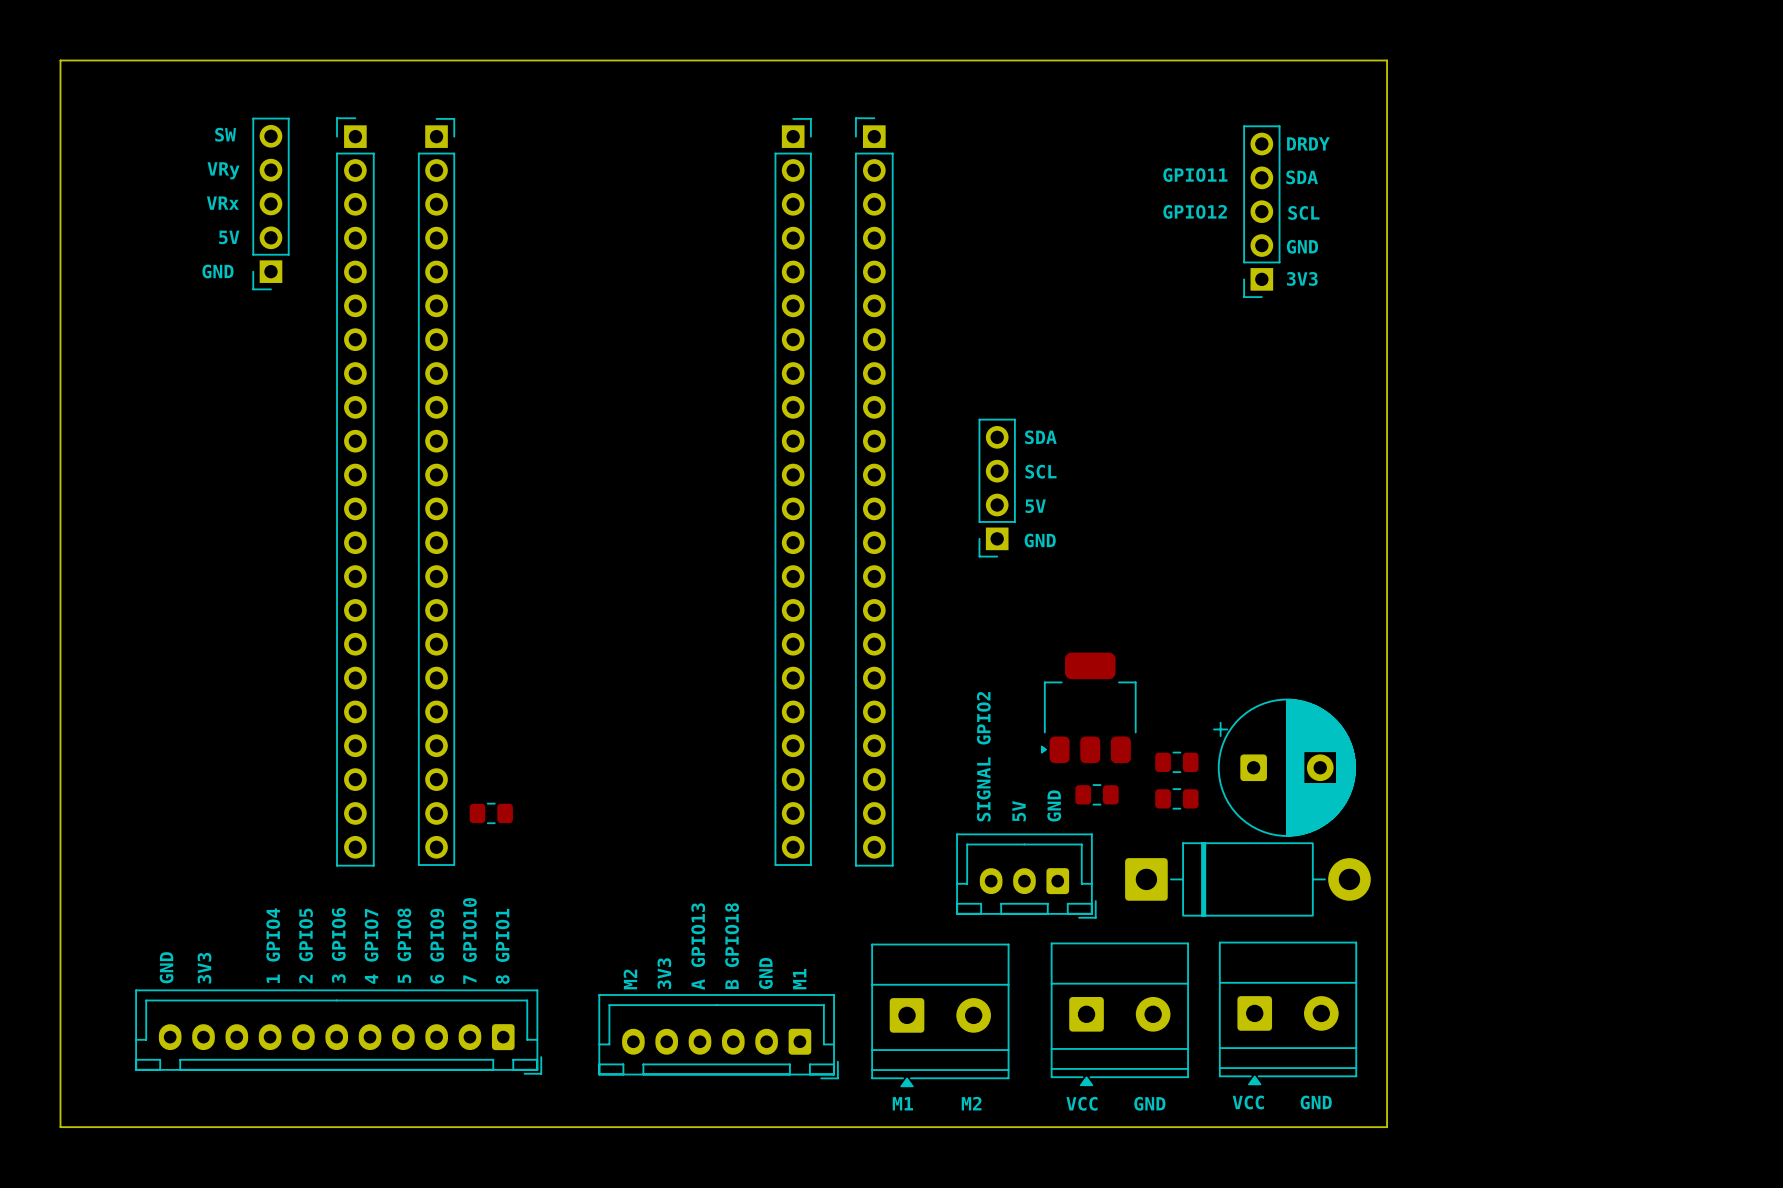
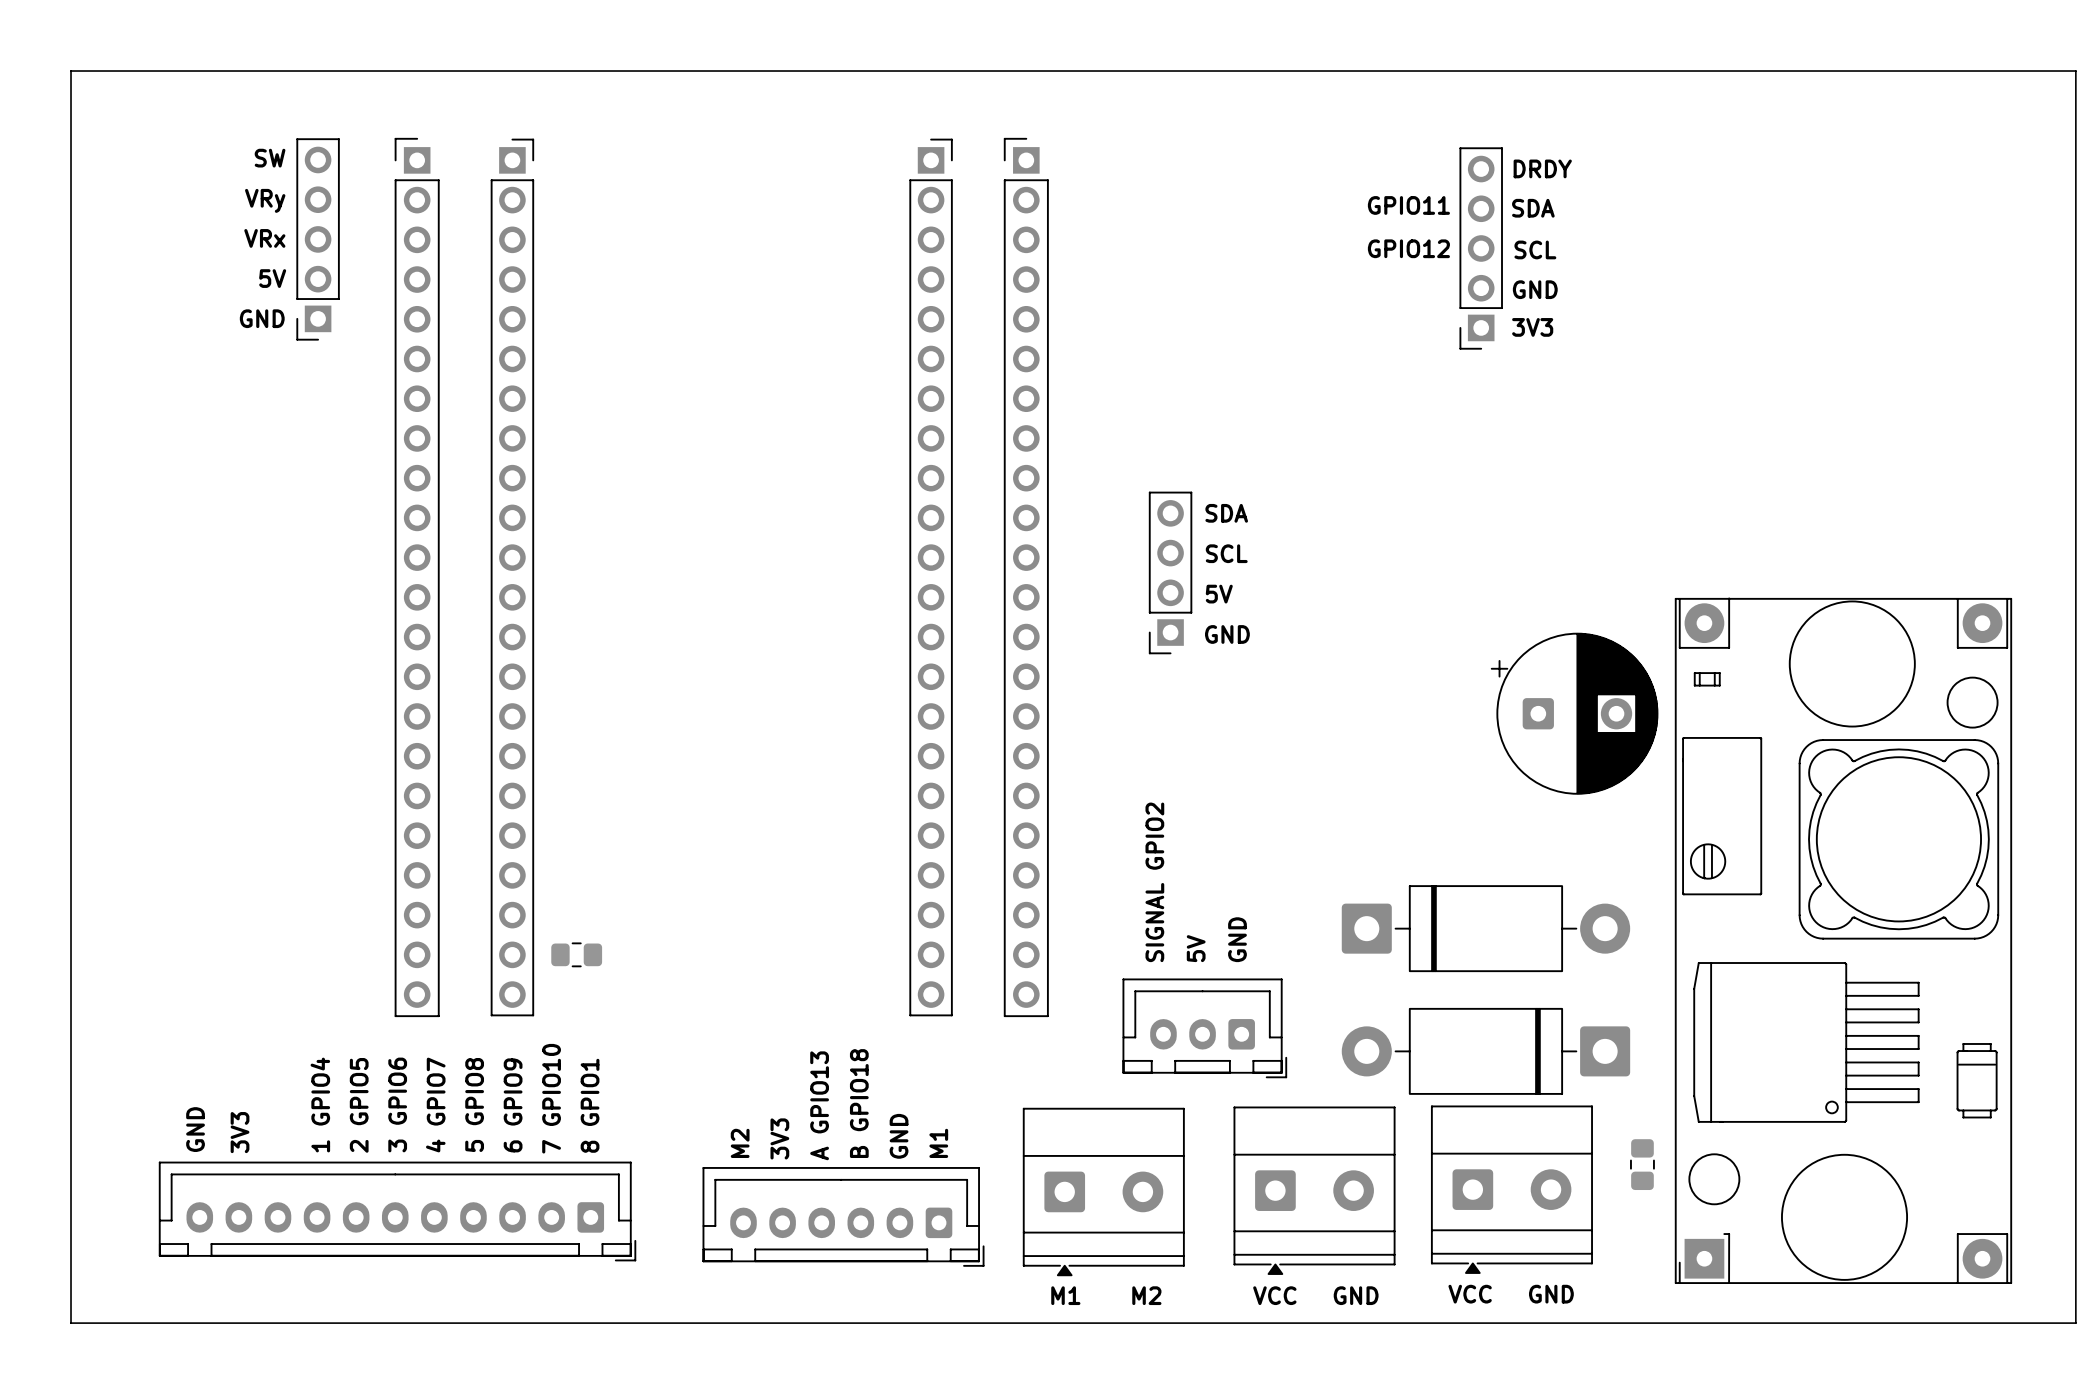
board edge: (1387, 60) (1387, 1127) -> (1628, 71) (2075, 71) (2075, 1323) (1628, 1323)
part: (1088, 707) -> none
part: (1176, 762) -> none
part position: (1284, 767) -> (1574, 713)
part: none -> (1485, 928)
part: (1097, 794) -> none
part: (1176, 798) -> none
part: none -> (1843, 940)
part rotation: 0° (1247, 879) -> 180° (1485, 1051)
part: none -> (1642, 1164)

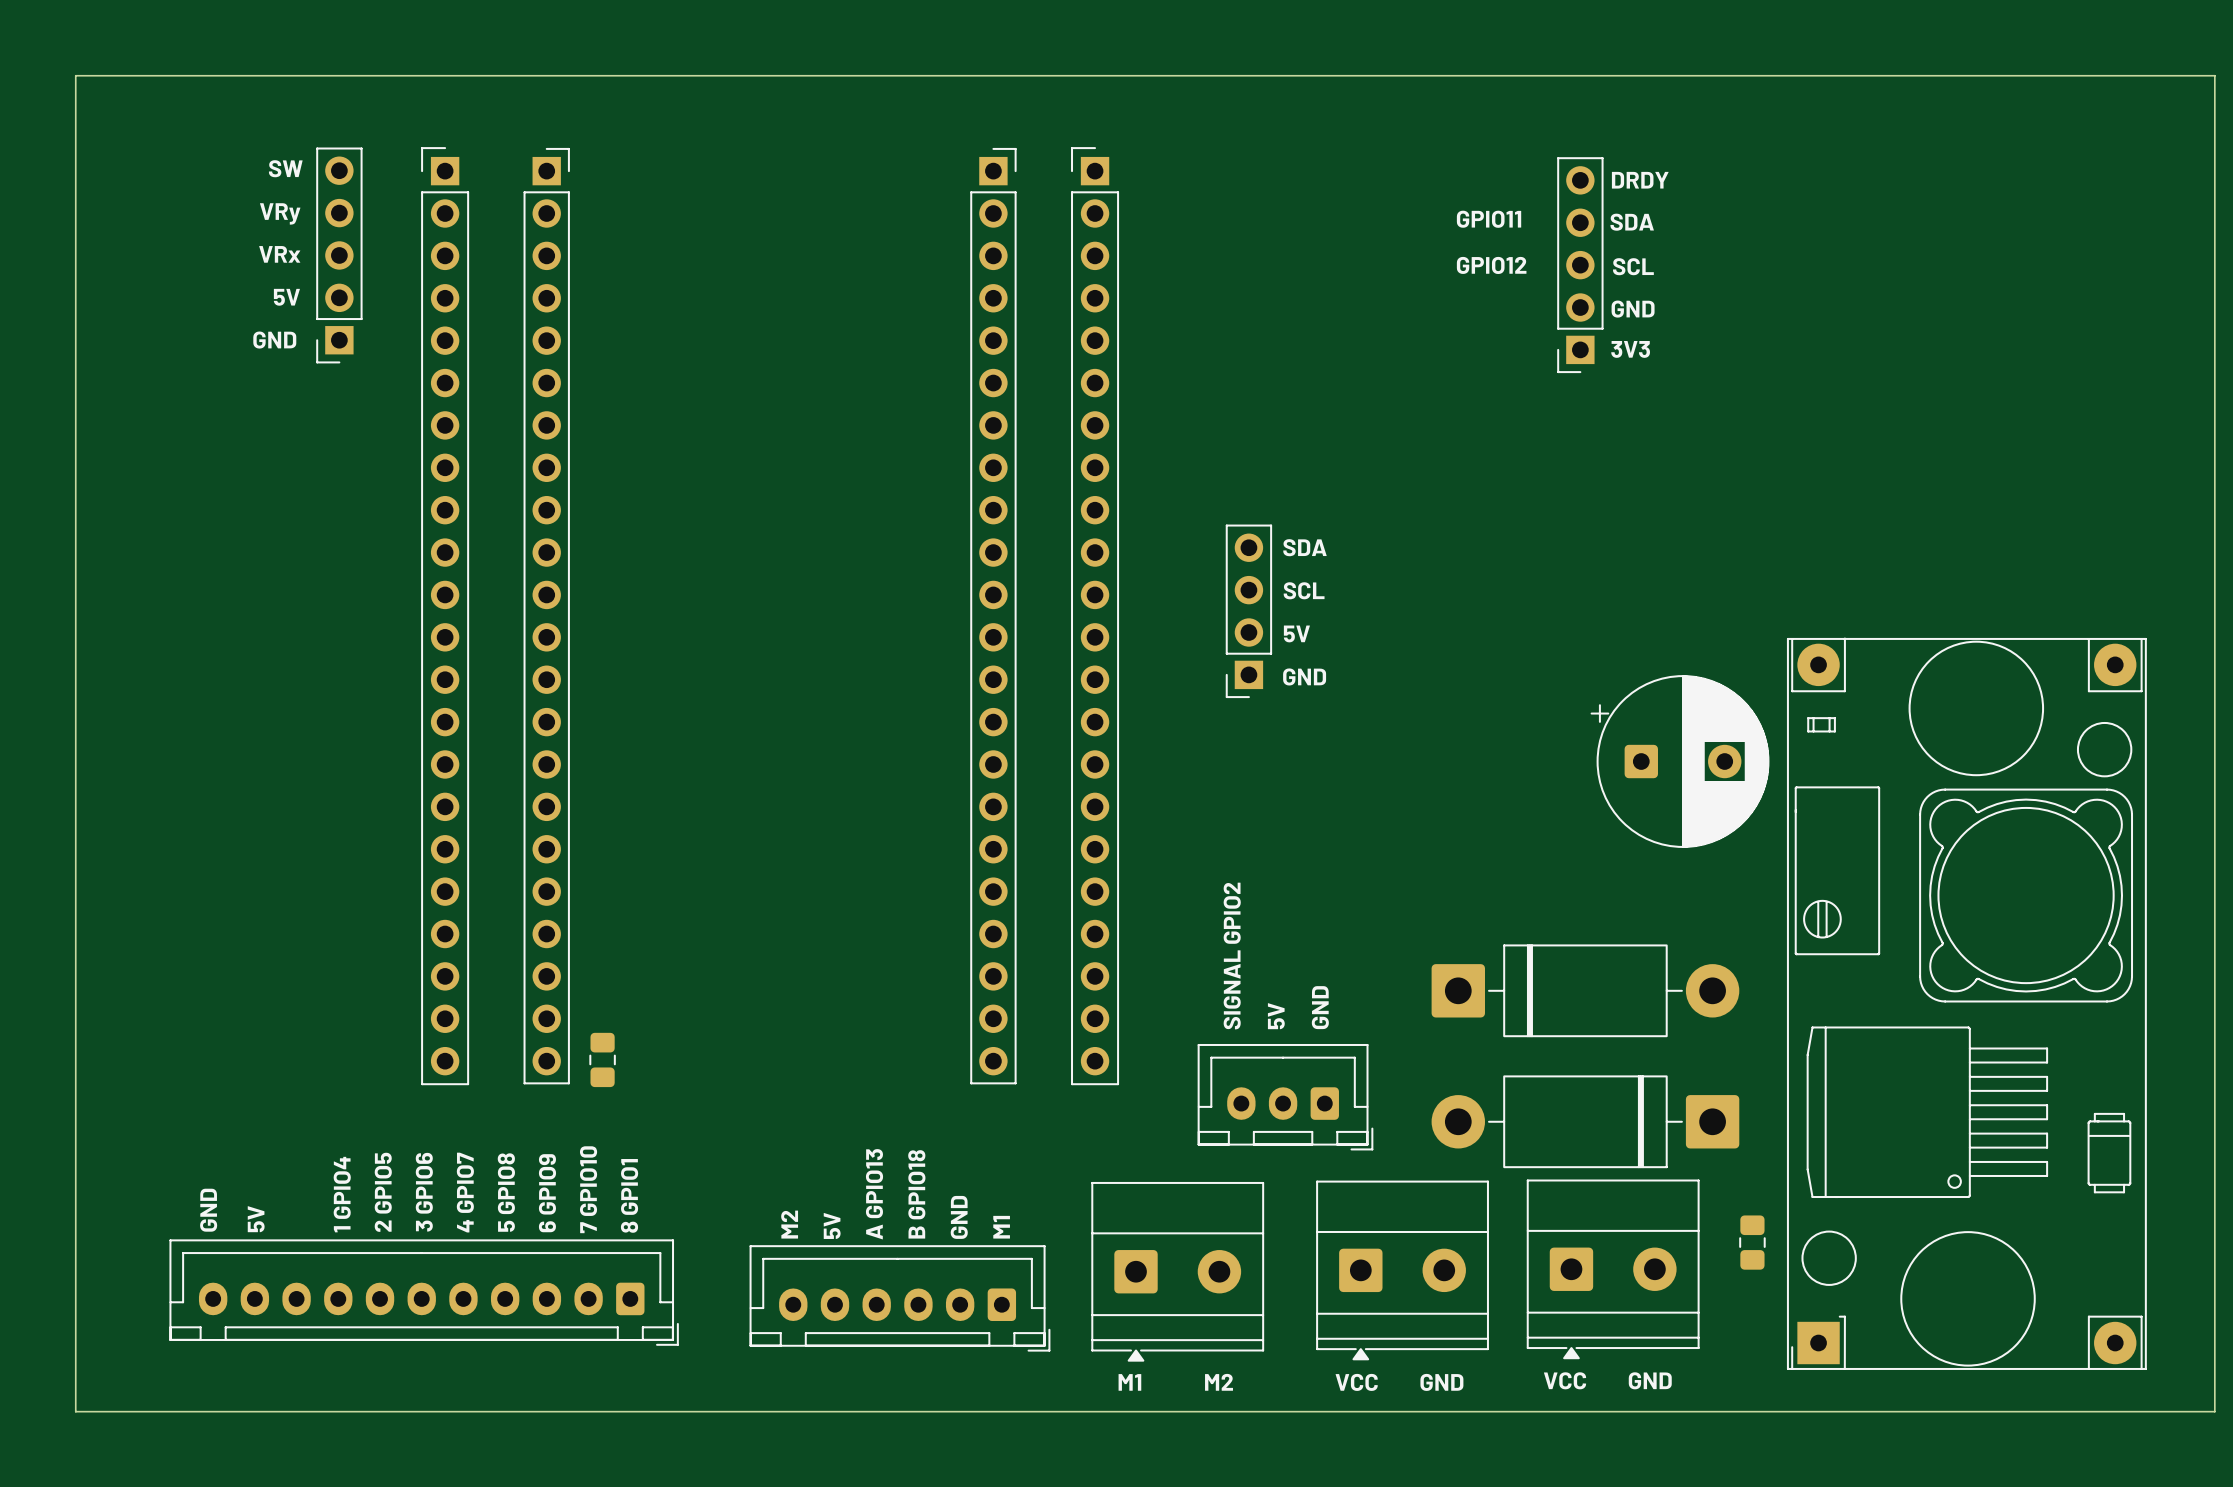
part rotation: 0° (576, 954) -> 90° clockwise (602, 1059)
part position: (576, 954) -> (602, 1059)
text: 3V3 (240, 1132) -> 5V (256, 1219)
text: 3V3 (779, 1138) -> 5V (832, 1225)

